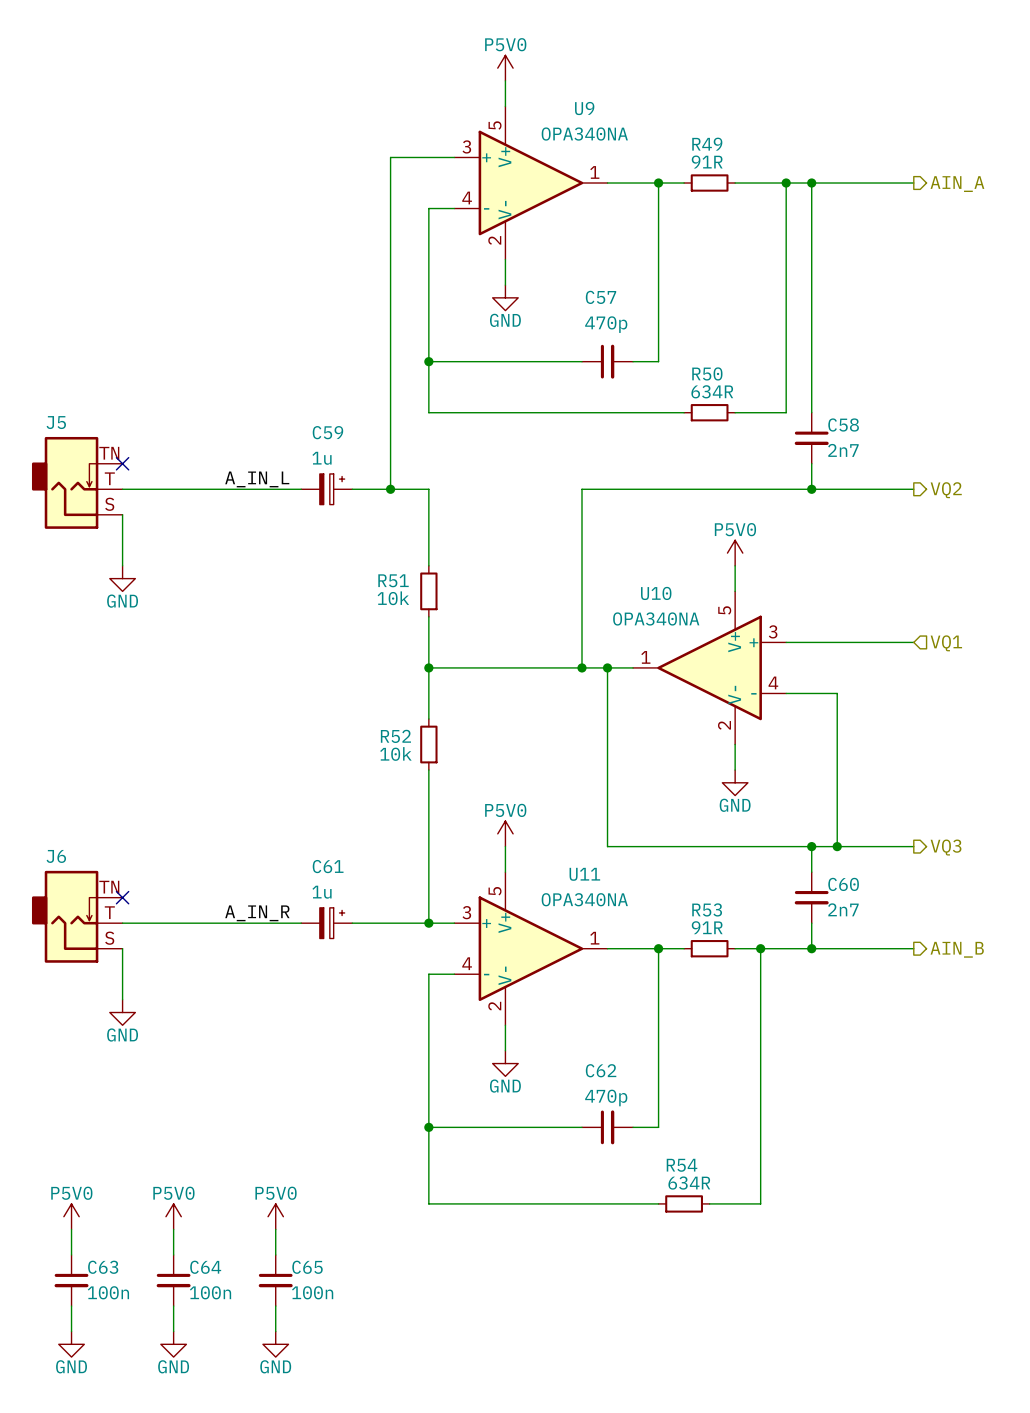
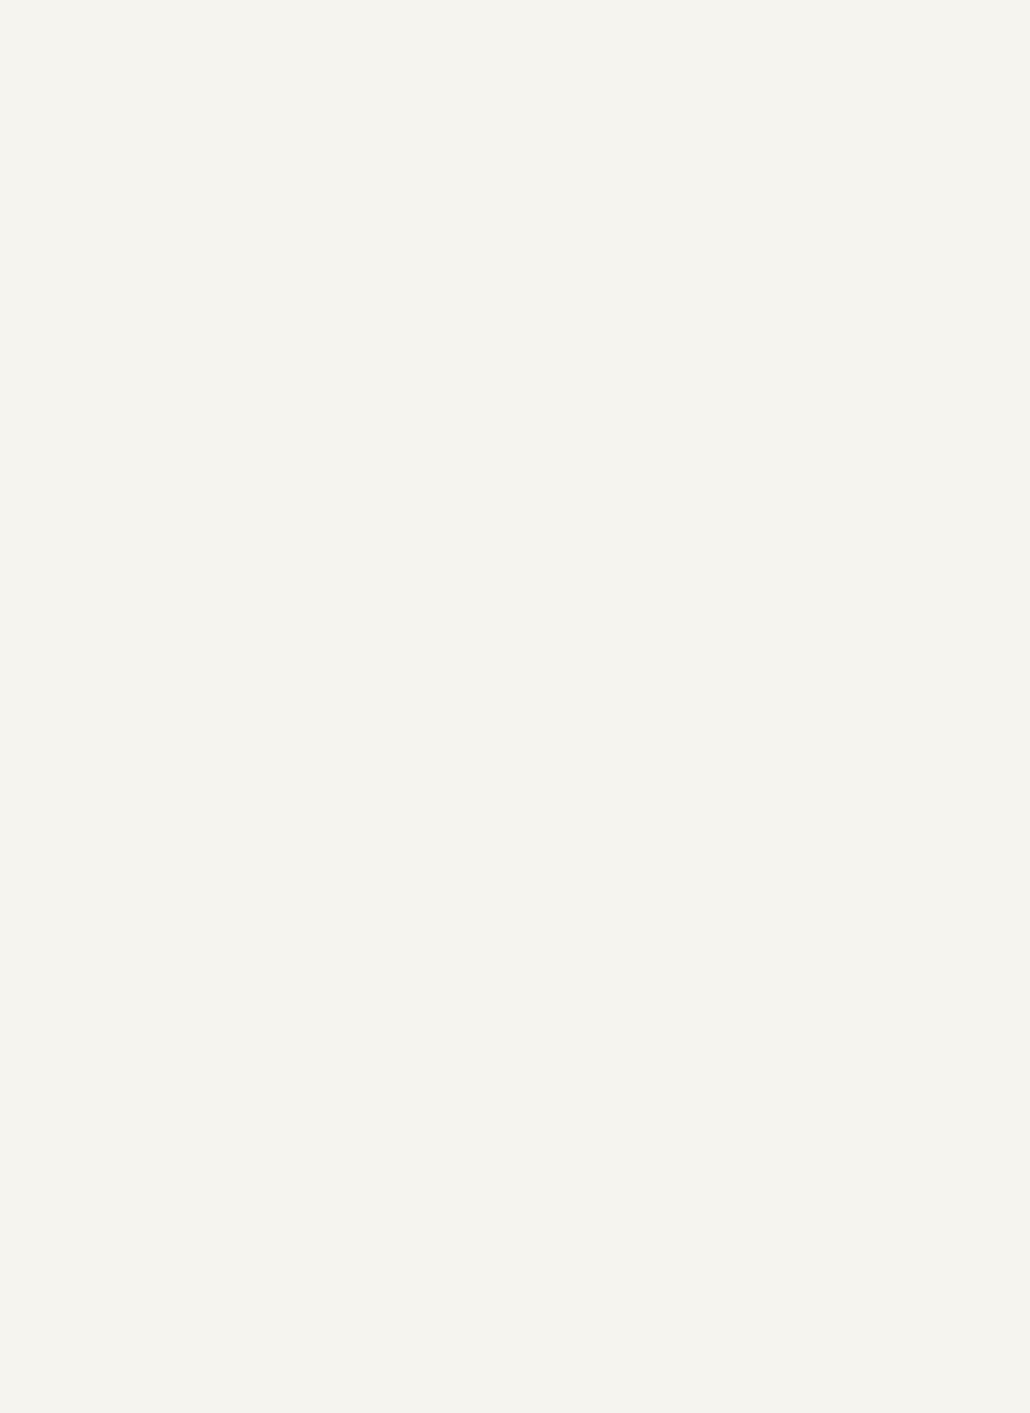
power symbol: P5V0 (505, 68) -> none
wire: (505, 80) (505, 106) -> none
wire: (454, 157) (390, 157) (390, 489) -> none
U9: OPA340NA (530, 183) -> none
wire: (607, 183) (684, 183) -> none
wire: (658, 183) (658, 361) (633, 361) -> none
junction: (658, 183) -> none
R49: 91R (709, 183) -> none
wire: (735, 183) (913, 183) -> none
wire: (786, 183) (786, 412) (735, 412) -> none
junction: (786, 183) -> none
wire: (811, 183) (811, 412) -> none
junction: (811, 183) -> none
hierarchical label: AIN_A (957, 184) -> none
wire: (454, 208) (428, 208) (428, 412) (684, 412) -> none
wire: (505, 259) (505, 285) -> none
power symbol: GND (505, 297) -> none
wire: (428, 361) (582, 361) -> none
junction: (428, 361) -> none
C57: 470p (607, 361) -> none
R50: 634R (709, 412) -> none
C58: 2n7 (811, 438) -> none
no-connect mark: (122, 463) -> none
wire: (811, 463) (811, 489) -> none
label: A_IN_L (257, 479) -> none
J5: (77, 482) -> none
wire: (122, 489) (301, 489) -> none
C59: 1u (326, 489) -> none
wire: (352, 489) (428, 489) (428, 565) -> none
junction: (390, 489) -> none
junction: (811, 489) -> none
wire: (913, 489) (582, 489) (582, 667) -> none
hierarchical label: VQ2 (946, 490) -> none
wire: (122, 514) (122, 565) -> none
power symbol: P5V0 (735, 553) -> none
wire: (735, 565) (735, 591) -> none
power symbol: GND (122, 578) -> none
R51: 10k (428, 591) -> none
wire: (428, 616) (428, 718) -> none
wire: (786, 642) (913, 642) -> none
hierarchical label: VQ1 (946, 643) -> none
wire: (428, 667) (633, 667) -> none
junction: (428, 667) -> none
junction: (582, 667) -> none
wire: (607, 667) (607, 846) (913, 846) -> none
junction: (607, 667) -> none
U10: OPA340NA (709, 667) -> none
wire: (786, 693) (837, 693) (837, 846) -> none
R52: 10k (428, 744) -> none
wire: (735, 744) (735, 770) -> none
wire: (428, 770) (428, 923) -> none
power symbol: GND (735, 782) -> none
power symbol: P5V0 (505, 833) -> none
wire: (505, 846) (505, 872) -> none
wire: (811, 846) (811, 872) -> none
junction: (811, 846) -> none
junction: (837, 846) -> none
hierarchical label: VQ3 (946, 847) -> none
no-connect mark: (122, 897) -> none
C60: 2n7 (811, 897) -> none
label: A_IN_R (257, 913) -> none
J6: (77, 916) -> none
wire: (122, 923) (301, 923) -> none
C61: 1u (326, 923) -> none
wire: (352, 923) (454, 923) -> none
junction: (428, 923) -> none
wire: (811, 923) (811, 948) -> none
wire: (122, 948) (122, 999) -> none
U11: OPA340NA (530, 948) -> none
wire: (607, 948) (684, 948) -> none
wire: (658, 948) (658, 1127) (633, 1127) -> none
junction: (658, 948) -> none
R53: 91R (709, 948) -> none
wire: (735, 948) (913, 948) -> none
wire: (760, 948) (760, 1203) (709, 1203) -> none
junction: (760, 948) -> none
junction: (811, 948) -> none
hierarchical label: AIN_B (957, 949) -> none
wire: (454, 974) (428, 974) (428, 1203) (658, 1203) -> none
power symbol: GND (122, 1012) -> none
wire: (505, 1025) (505, 1050) -> none
power symbol: GND (505, 1063) -> none
wire: (428, 1127) (582, 1127) -> none
junction: (428, 1127) -> none
C62: 470p (607, 1127) -> none
R54: 634R (684, 1203) -> none
power symbol: P5V0 (71, 1216) -> none
power symbol: P5V0 (173, 1216) -> none
power symbol: P5V0 (275, 1216) -> none
wire: (71, 1229) (71, 1254) -> none
wire: (173, 1229) (173, 1254) -> none
wire: (275, 1229) (275, 1254) -> none
C63: 100n (71, 1280) -> none
C64: 100n (173, 1280) -> none
C65: 100n (275, 1280) -> none
wire: (71, 1306) (71, 1331) -> none
wire: (173, 1306) (173, 1331) -> none
wire: (275, 1306) (275, 1331) -> none
power symbol: GND (71, 1344) -> none
power symbol: GND (173, 1344) -> none
power symbol: GND (275, 1344) -> none

